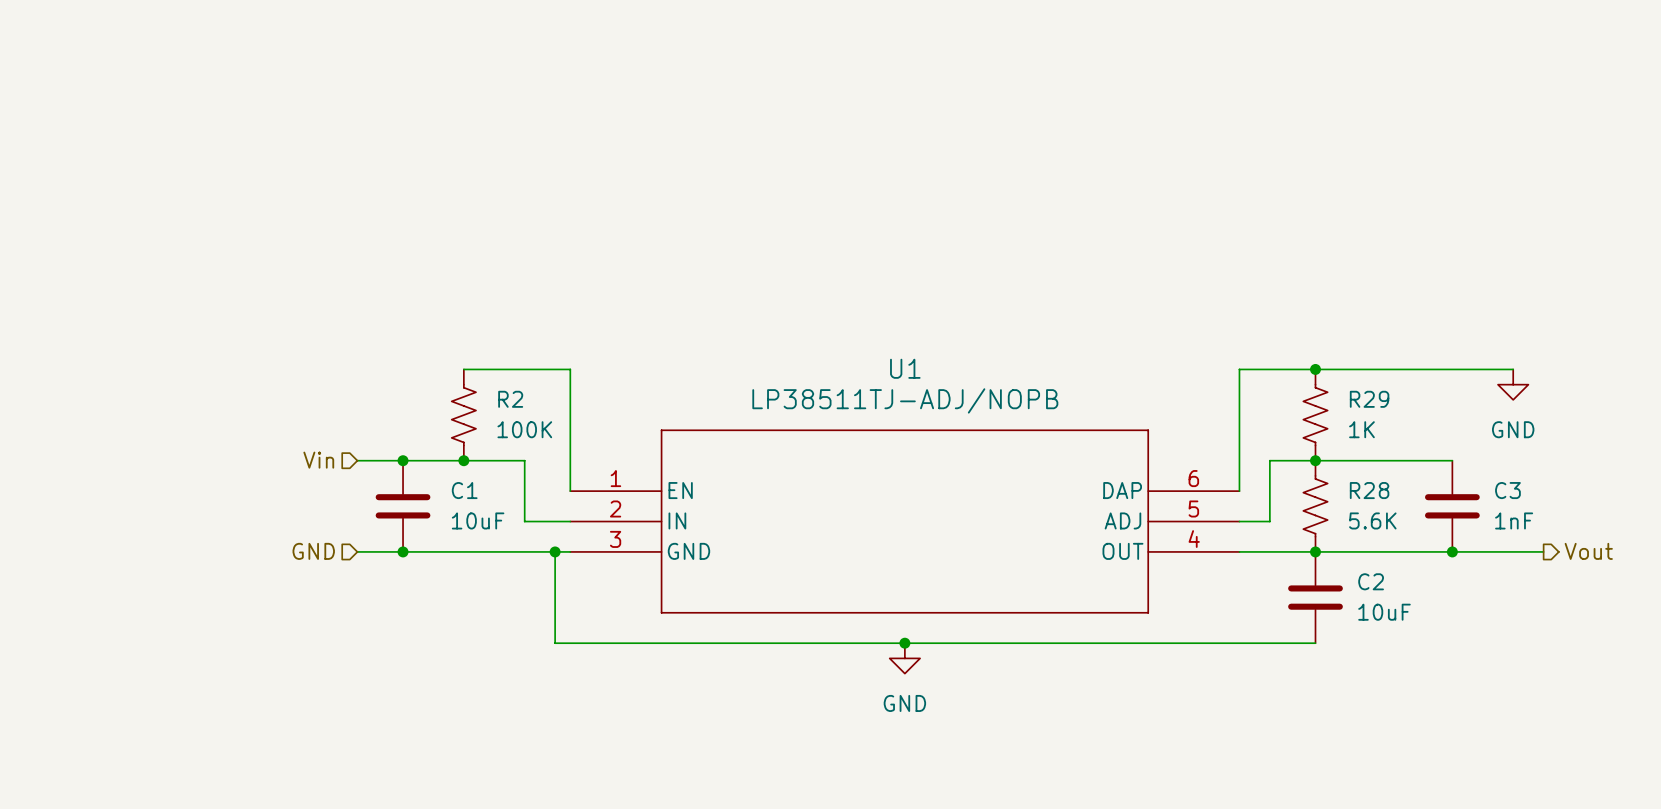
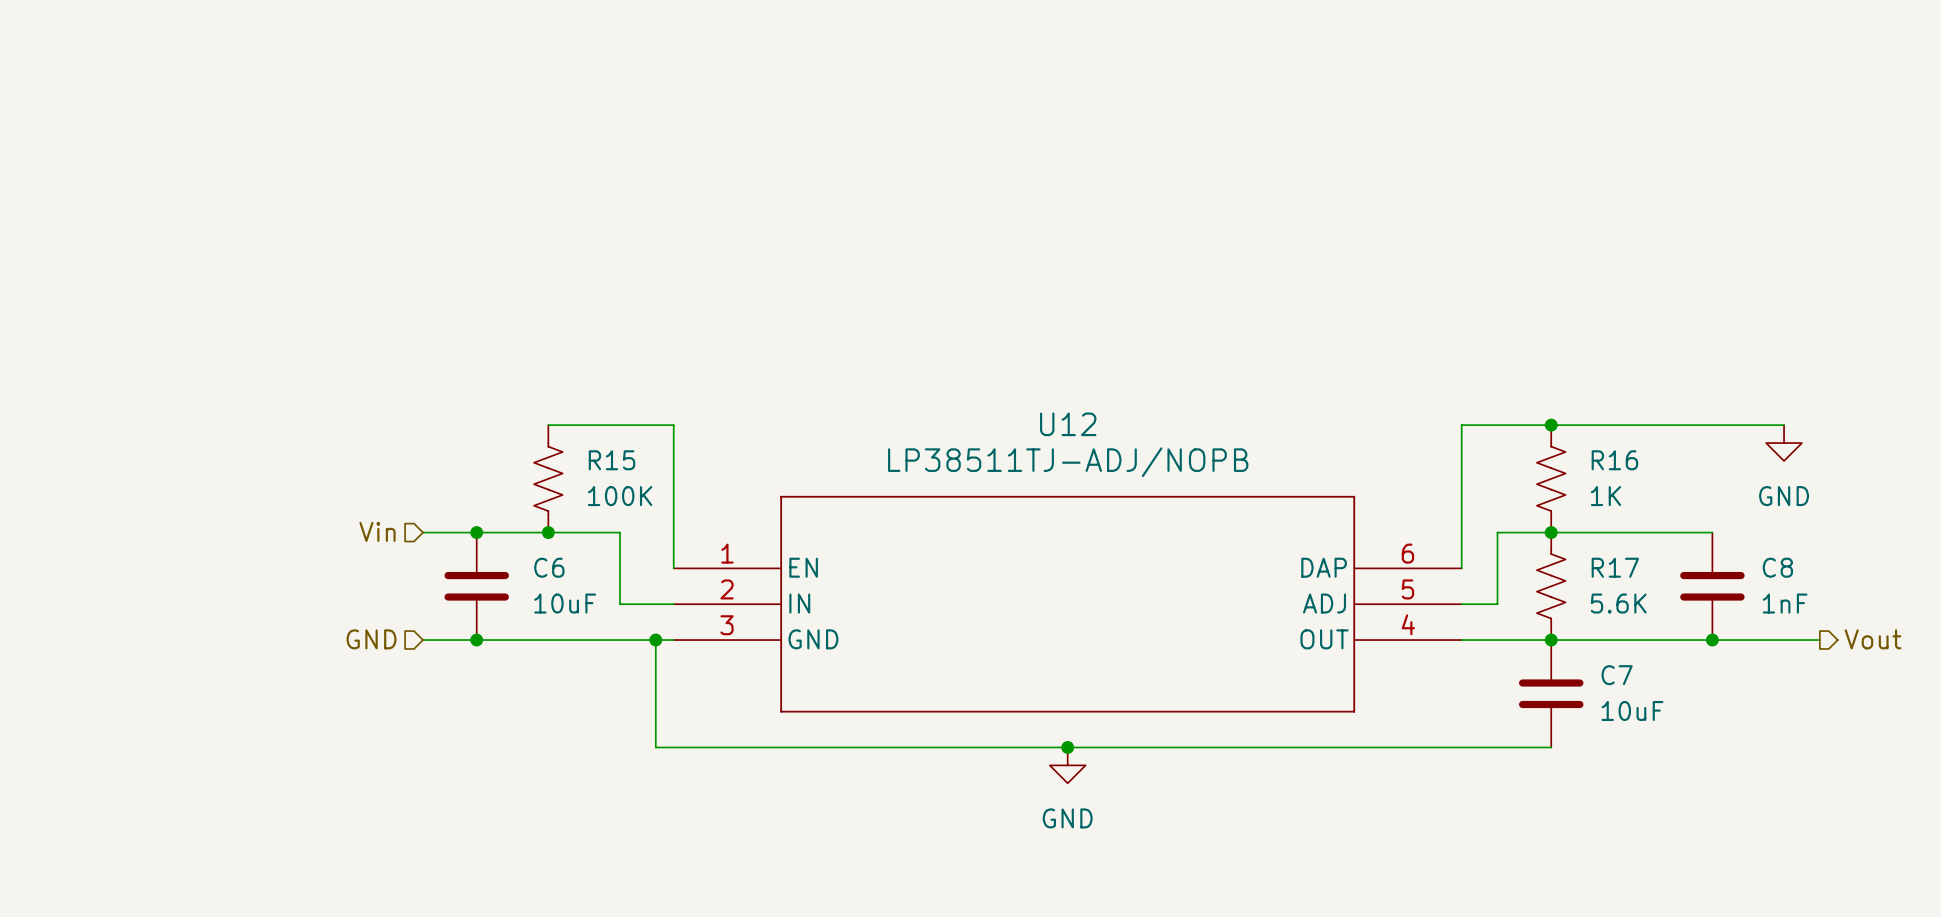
U1 name: U1 (905, 368) -> U12 (1068, 424)
R2 name: R2 (510, 399) -> R15 (612, 460)
R29 name: R29 (1369, 399) -> R16 (1614, 460)
C1 name: C1 (464, 490) -> C6 (549, 567)
R28 name: R28 (1369, 490) -> R17 (1615, 567)
C3 name: C3 (1507, 490) -> C8 (1777, 567)
C2 name: C2 (1371, 581) -> C7 (1617, 675)

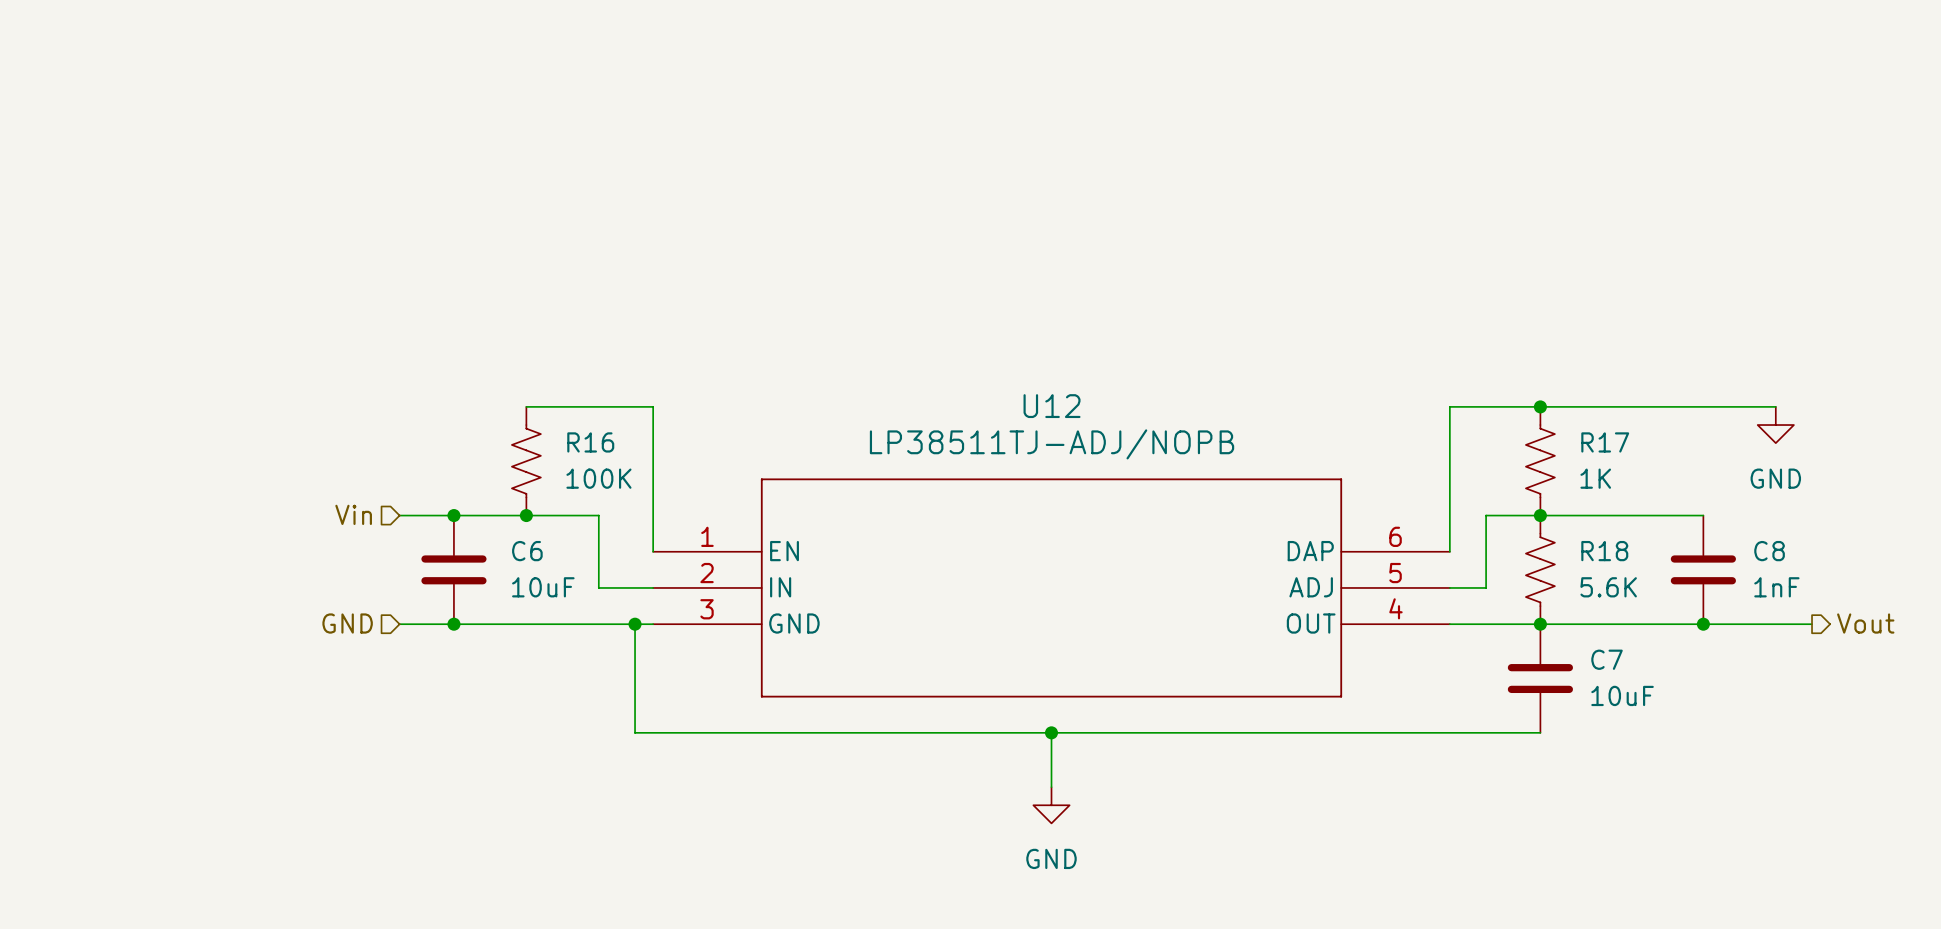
R15 name: R15 (612, 460) -> R16 (590, 442)
R16 name: R16 (1614, 460) -> R17 (1605, 442)
R17 name: R17 (1615, 567) -> R18 (1604, 551)
wire: none -> (1051, 732) (1051, 787)
power symbol position: GND (1067, 765) -> GND (1051, 805)

